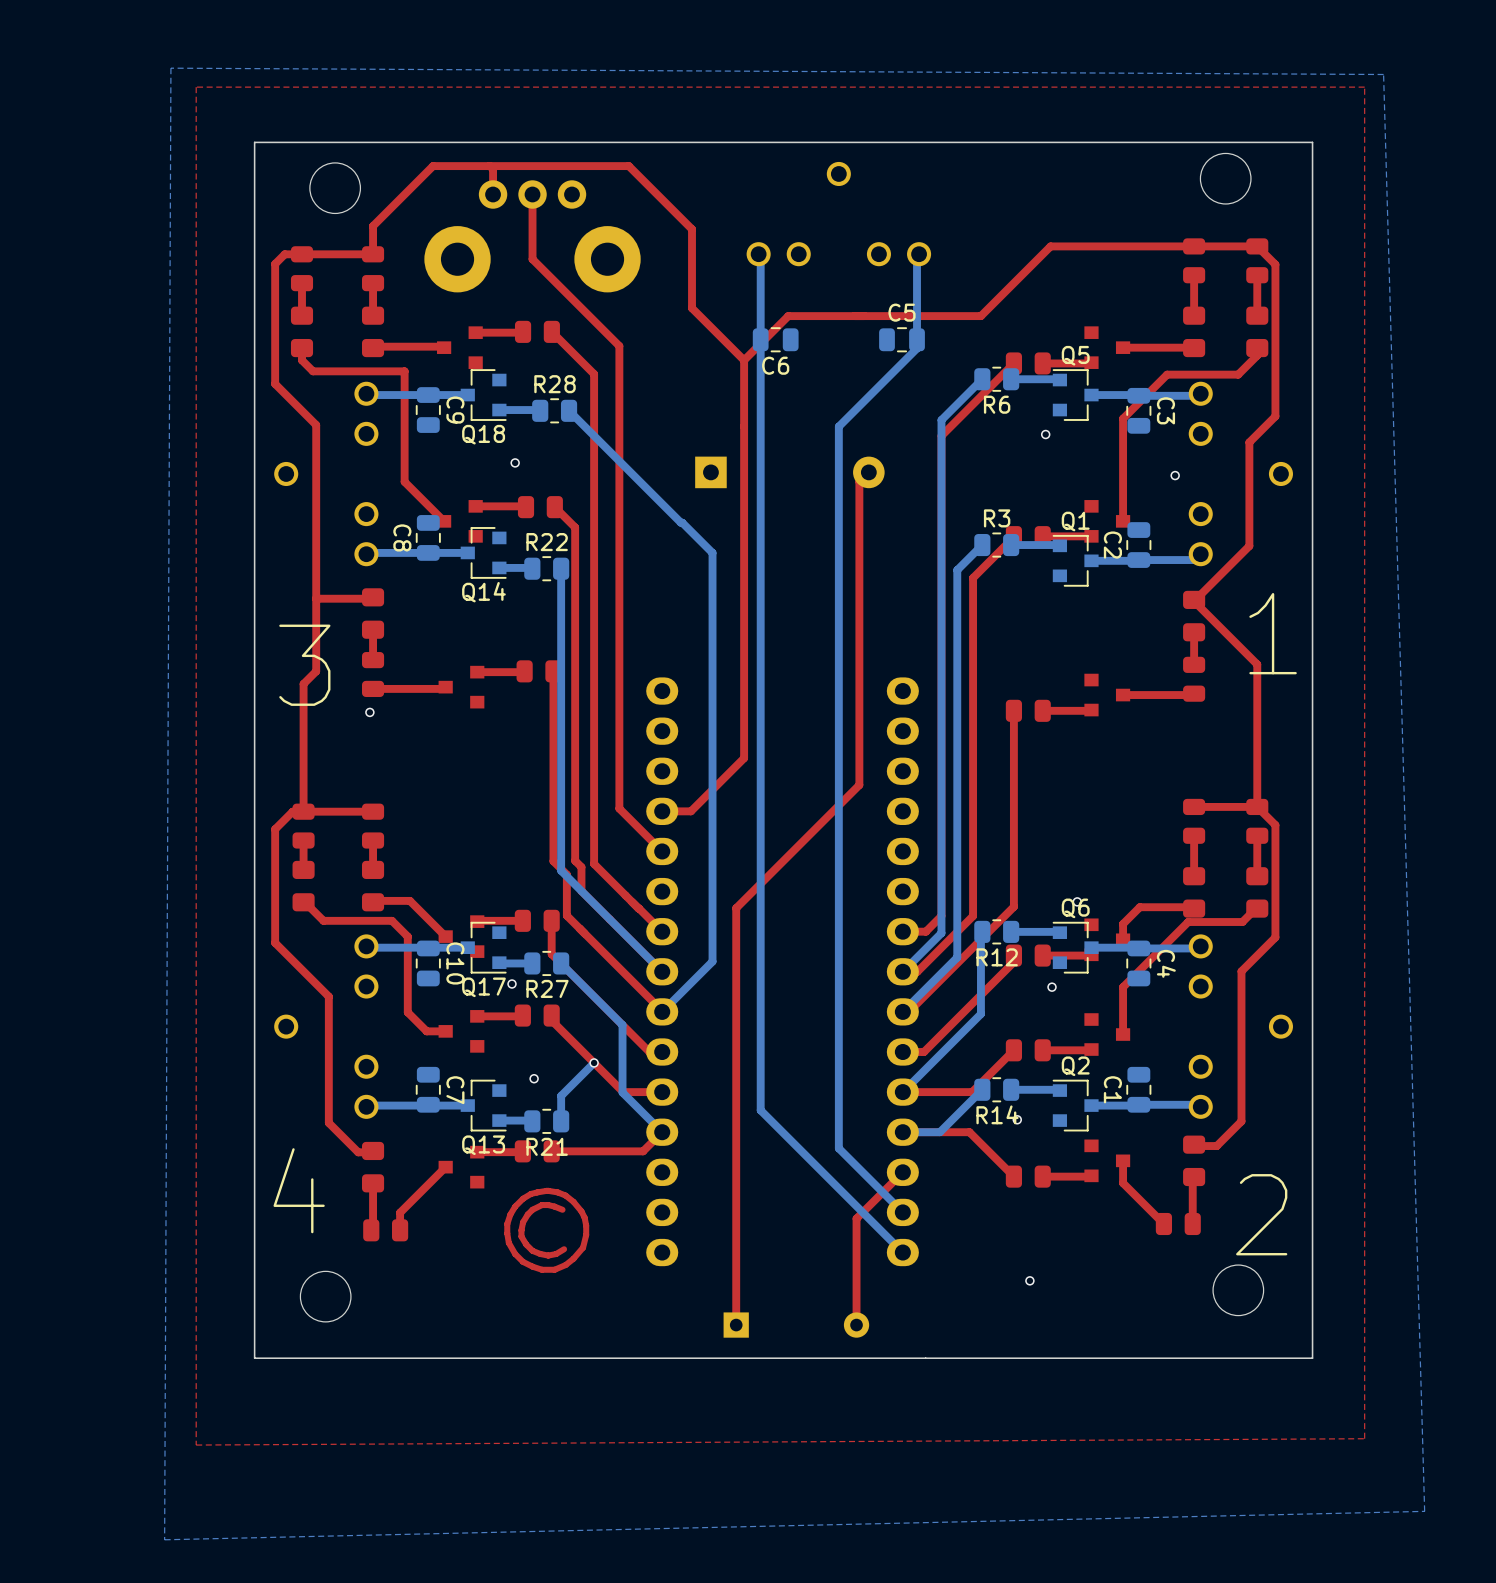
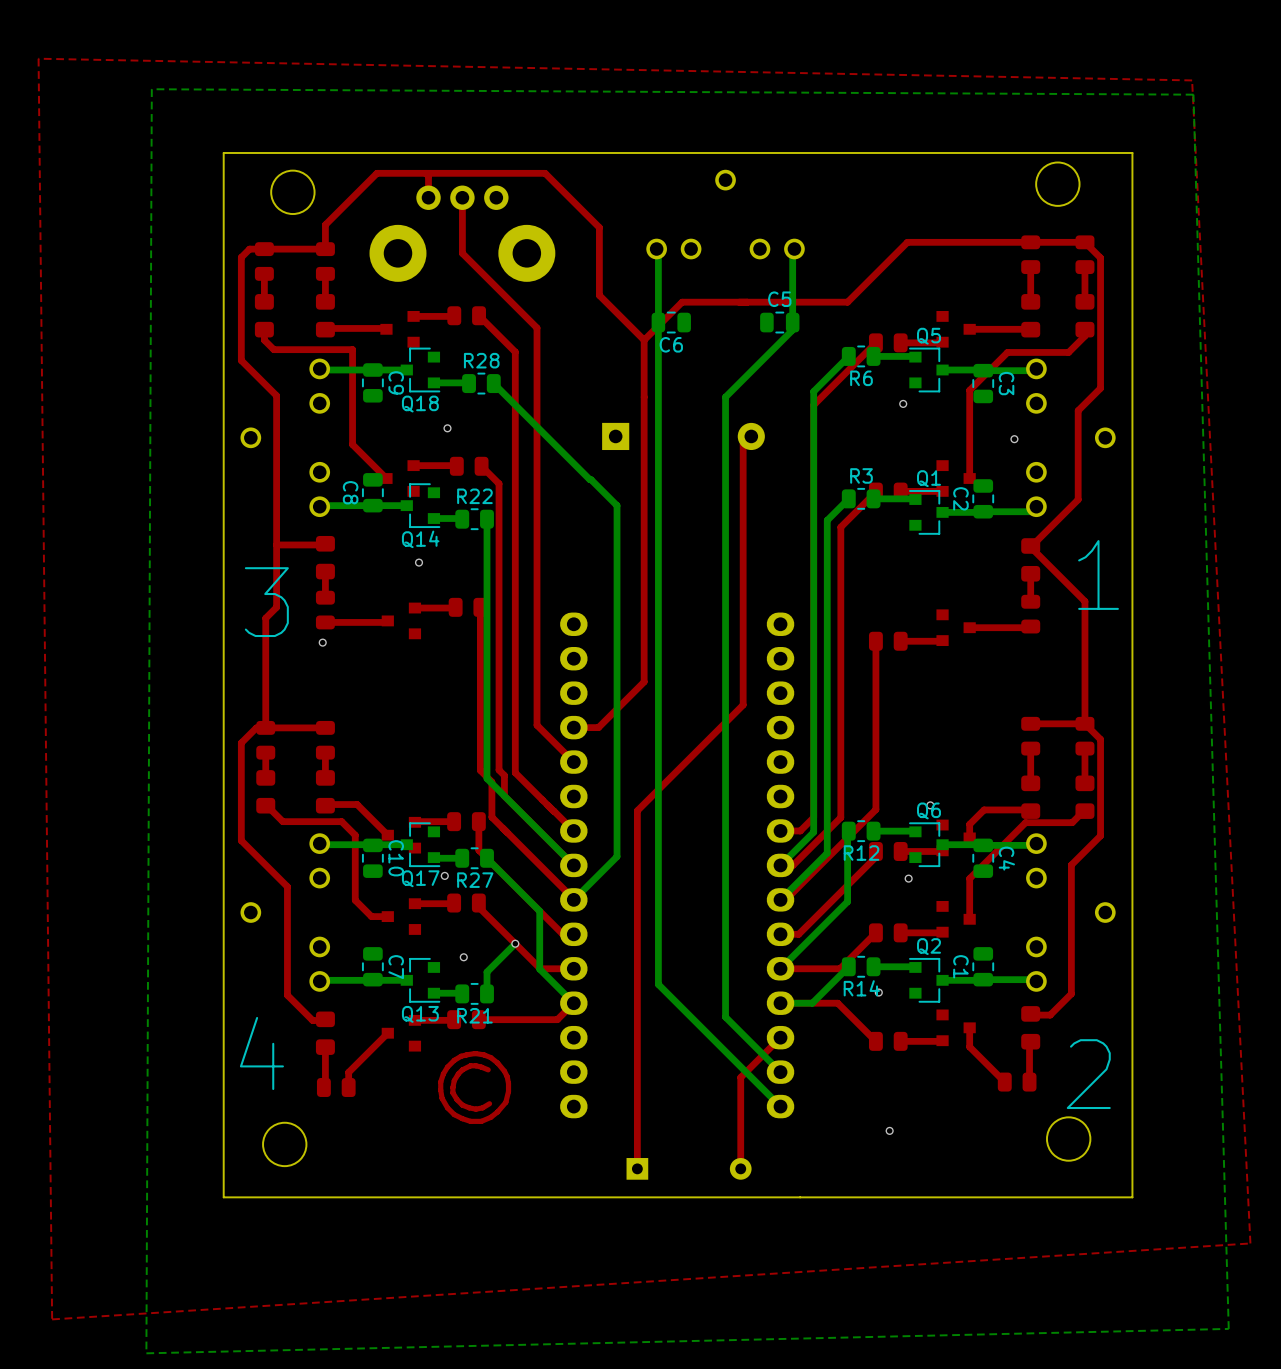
top zone outline: (1364, 87) (1364, 1438) (196, 1445) (196, 87) (1364, 87) -> (38, 58) (1192, 80) (1250, 1243) (52, 1319) (38, 58)
via: none -> (419, 562)

